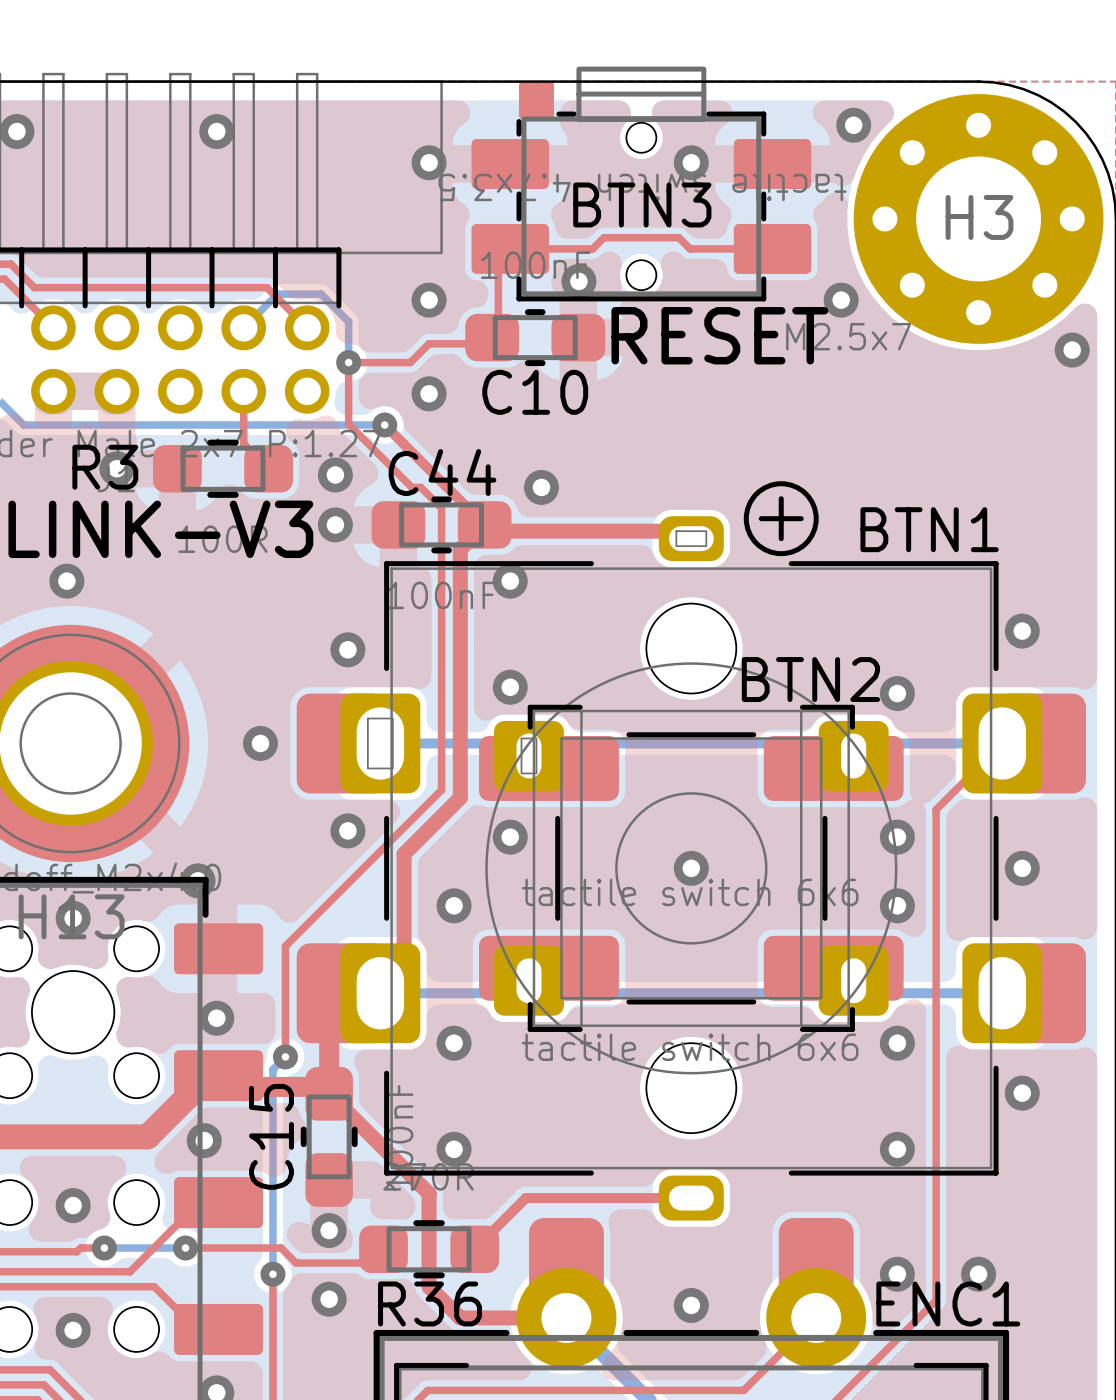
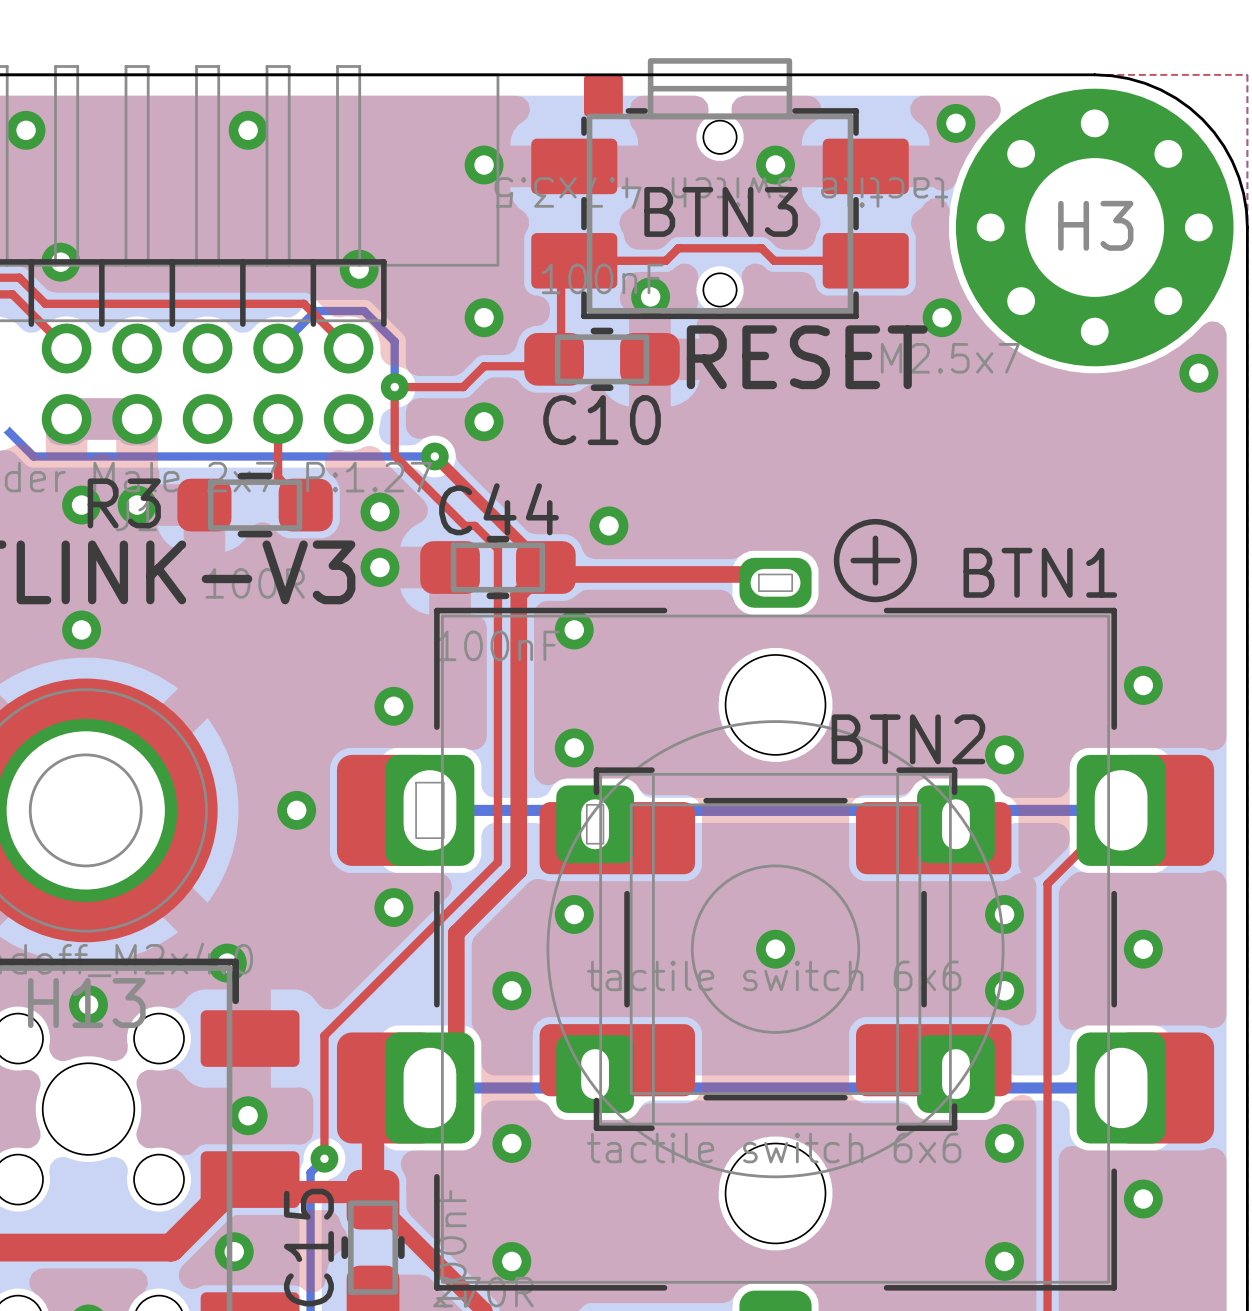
via: none -> (60, 262)
via: none -> (359, 269)
via: none -> (81, 505)

